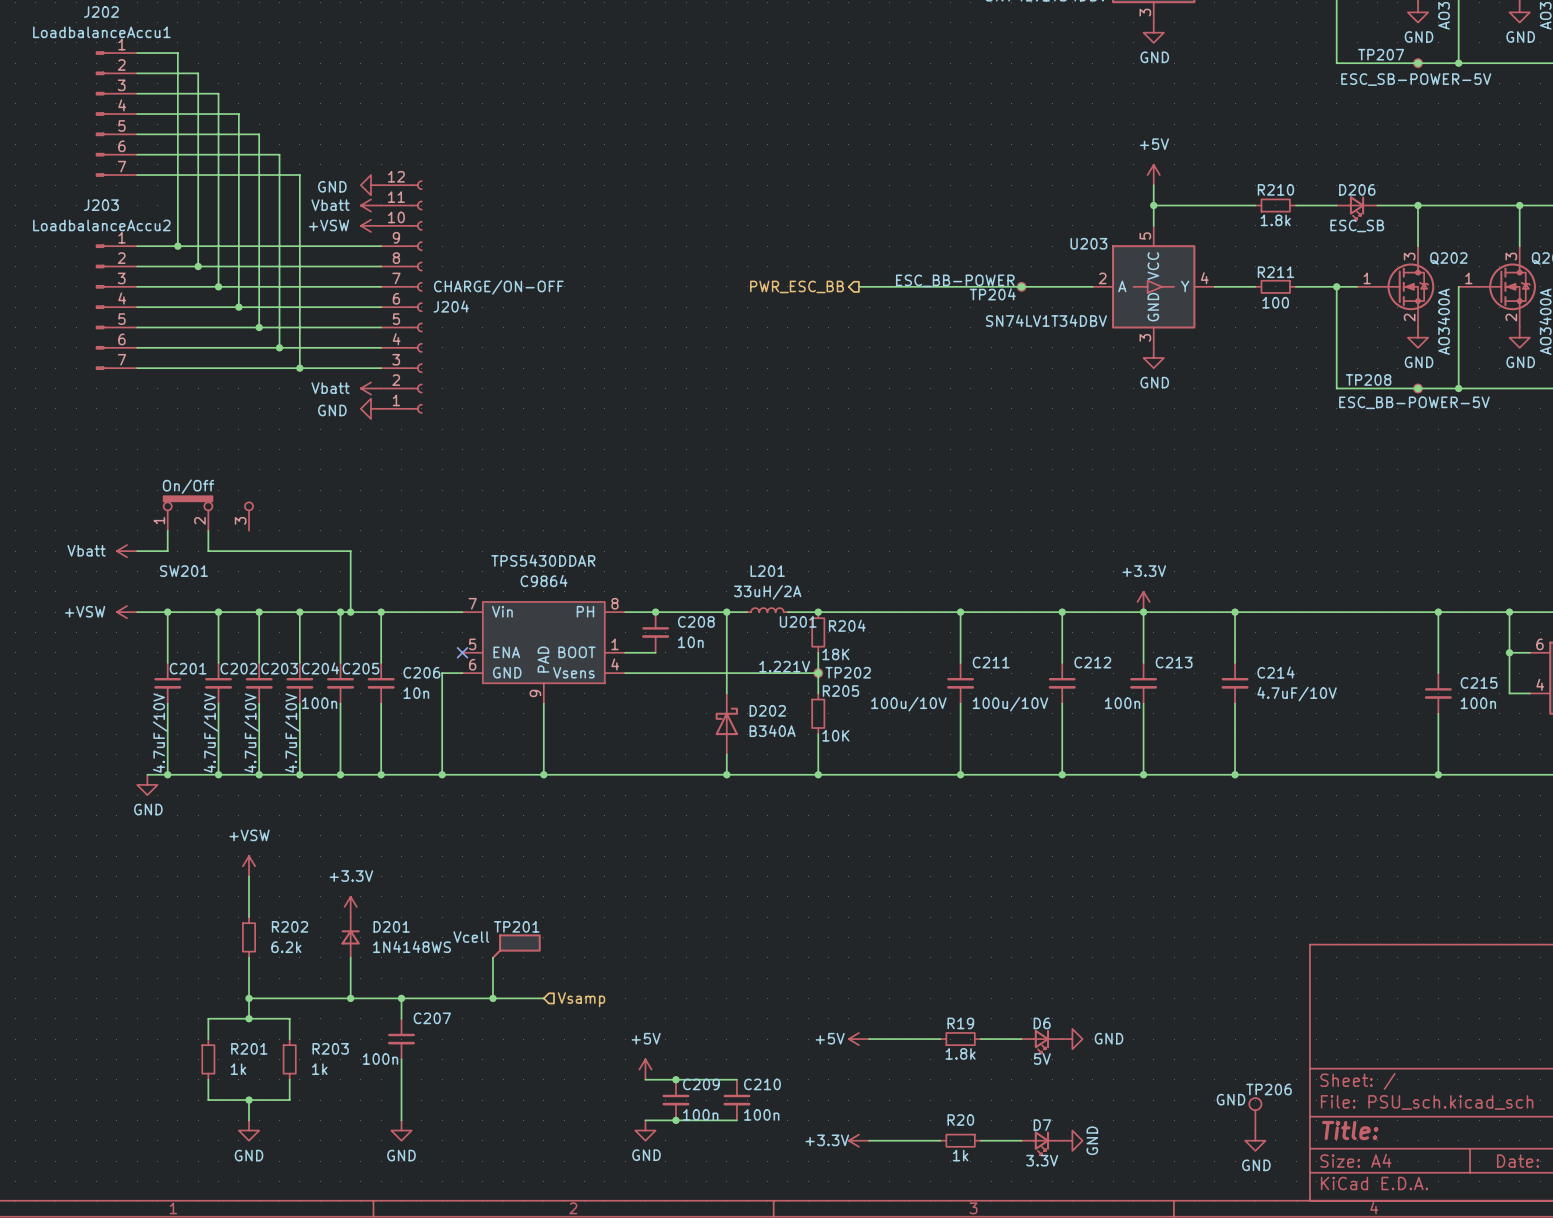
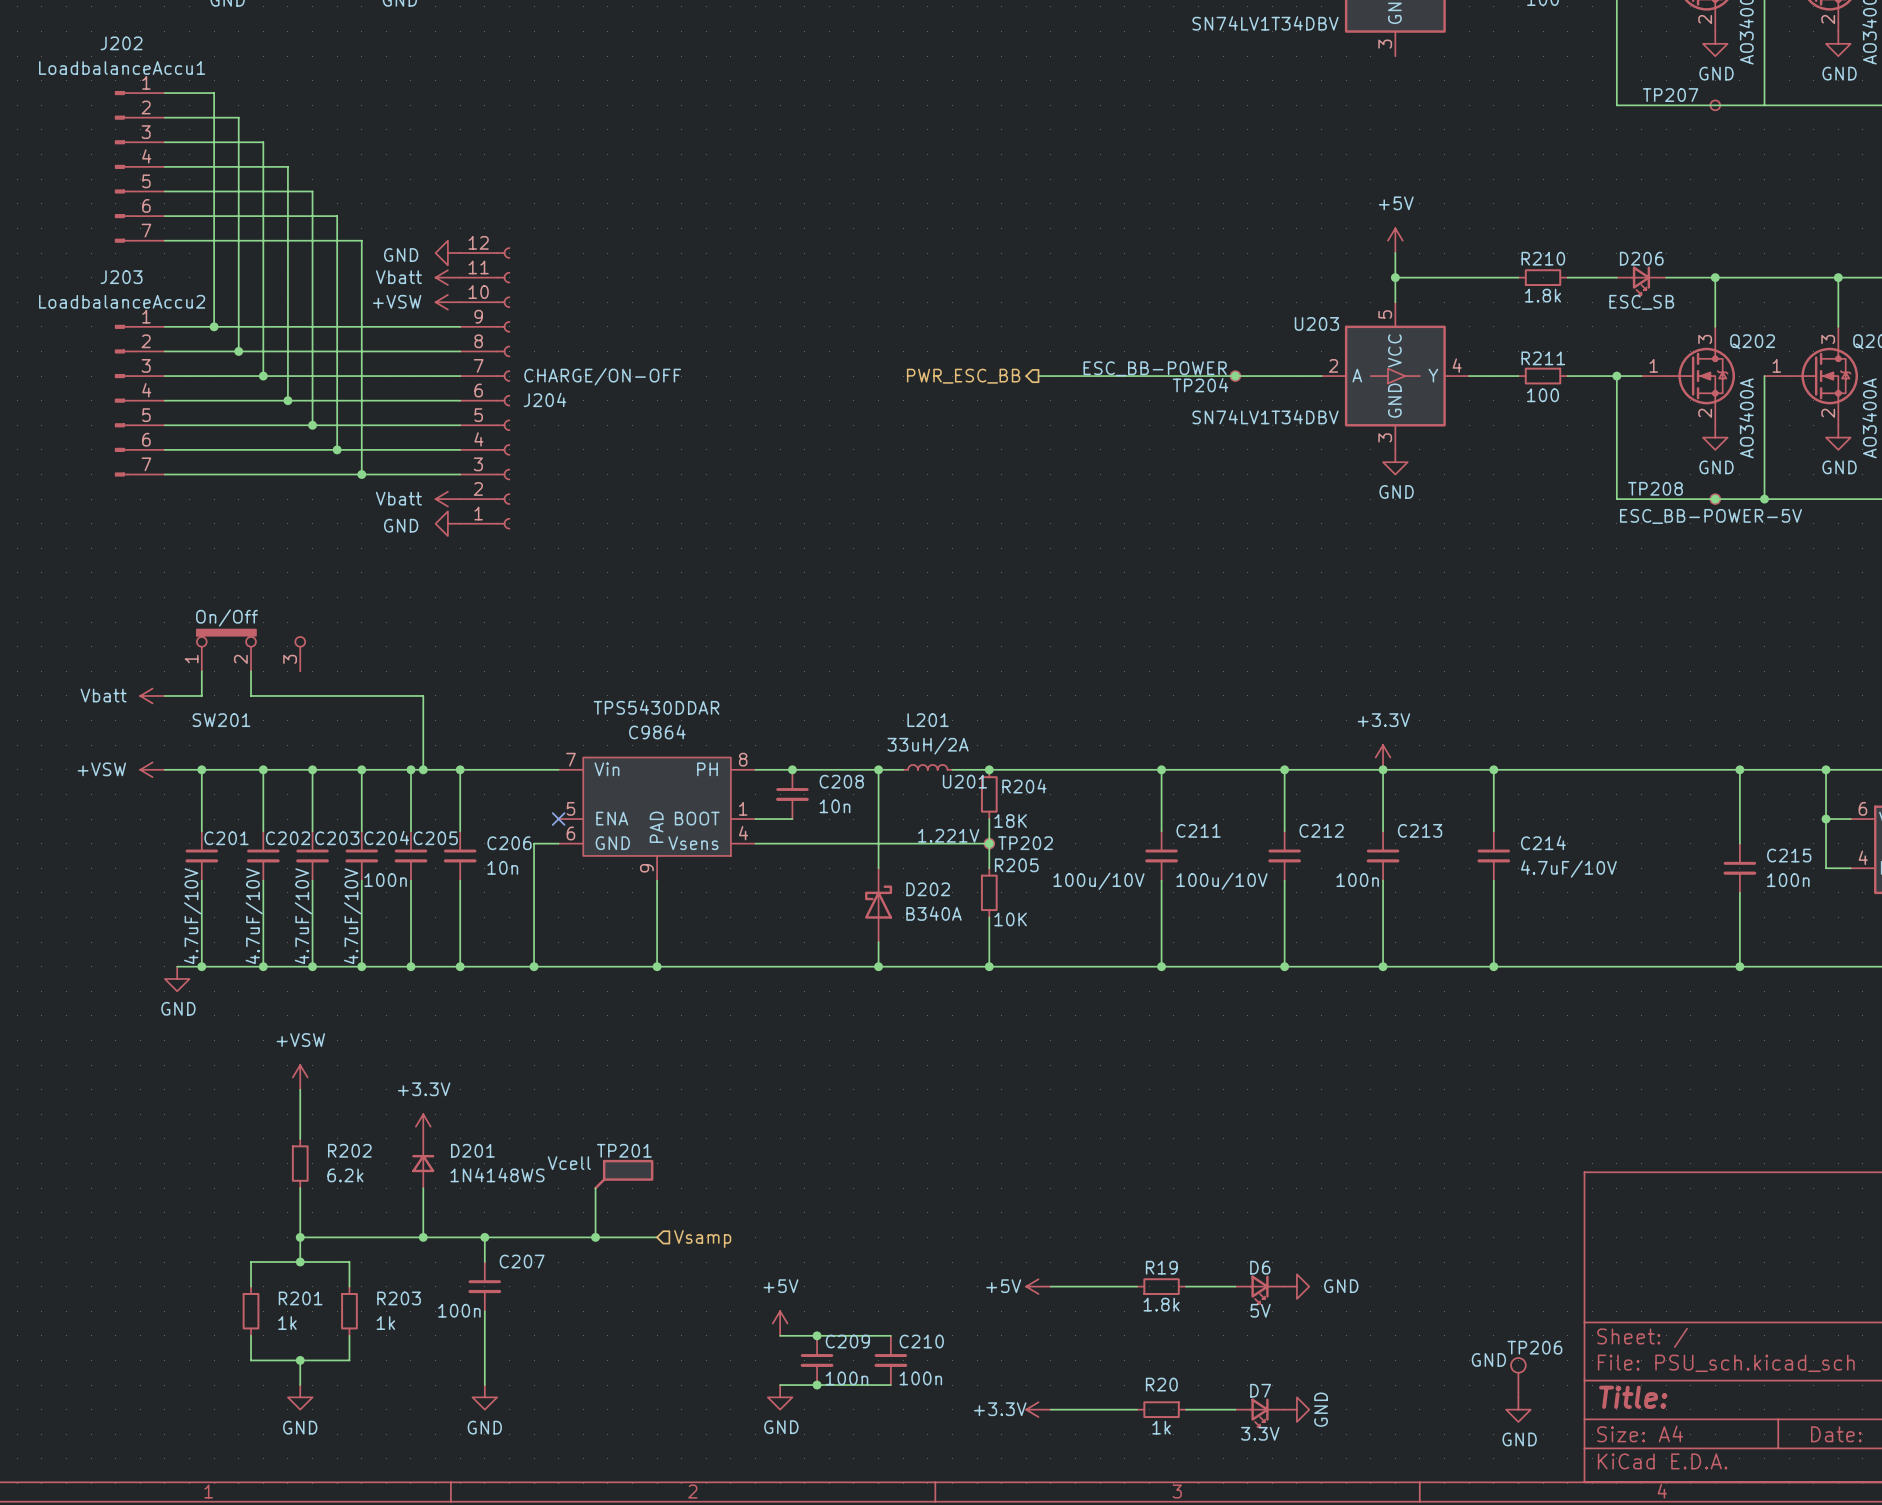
power symbol: GND (1153, 32) -> none
junction: (1418, 63) -> none
junction: (1458, 63) -> none
TP207 value: ESC_SB-POWER-5V (1416, 79) -> none

